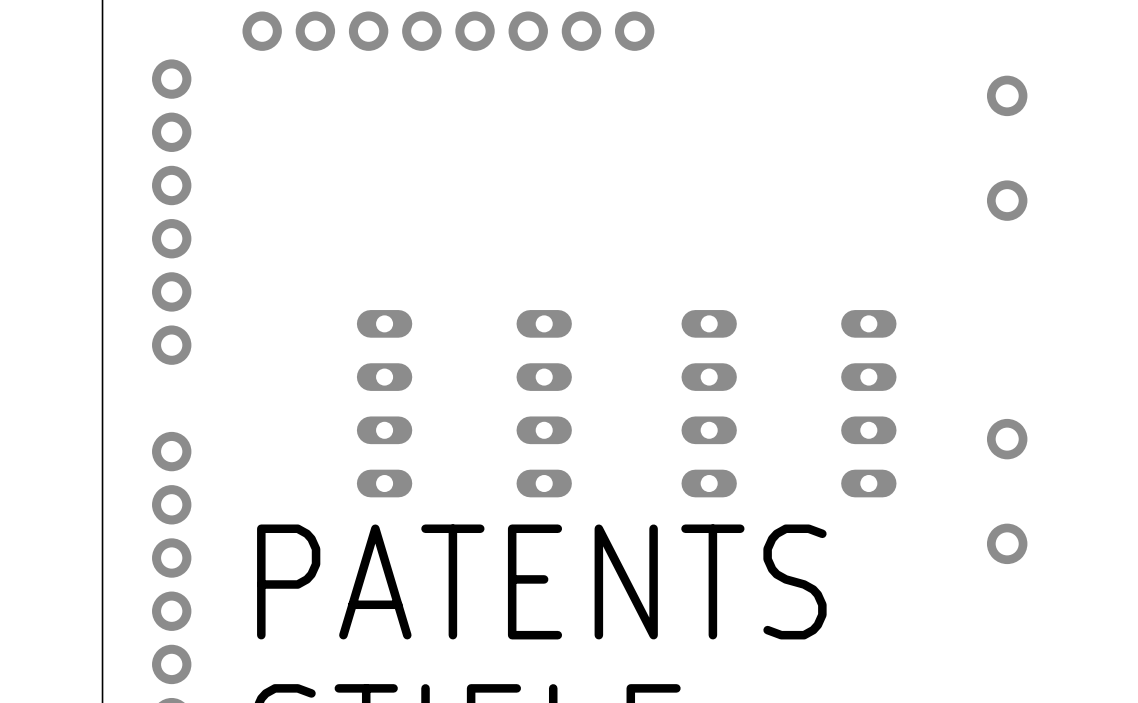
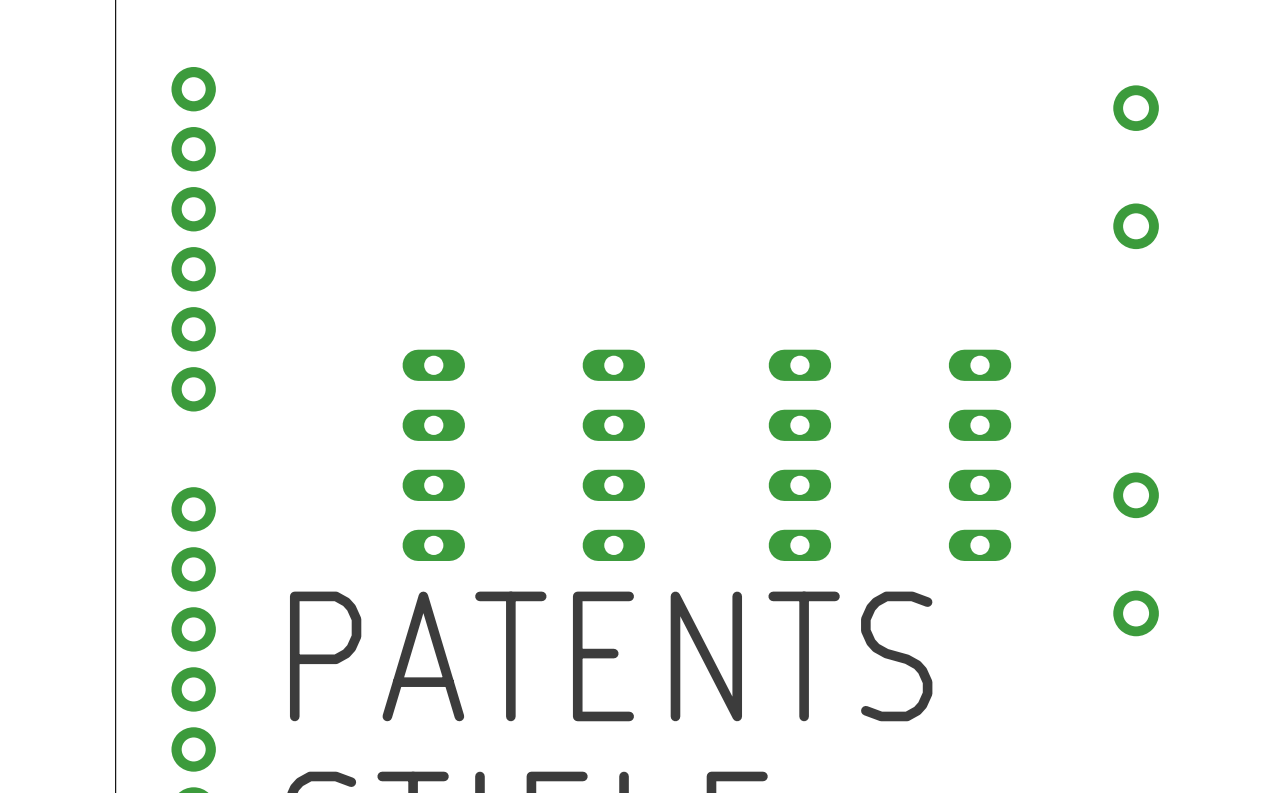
part: (288, 31) -> none
part: (395, 31) -> none
part: (501, 31) -> none
part: (608, 31) -> none

